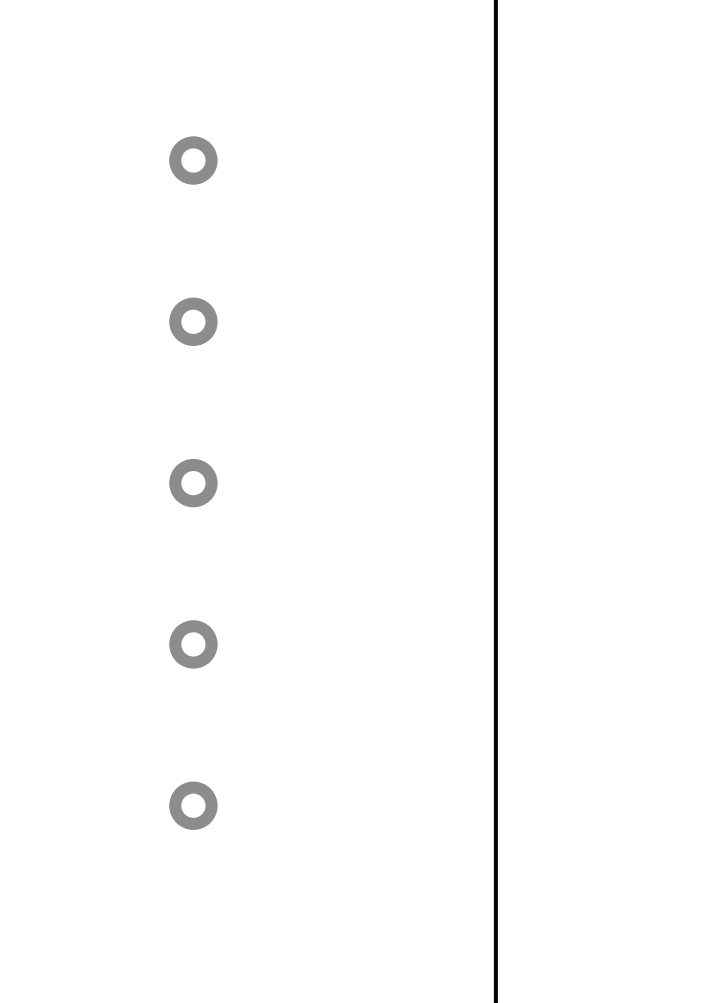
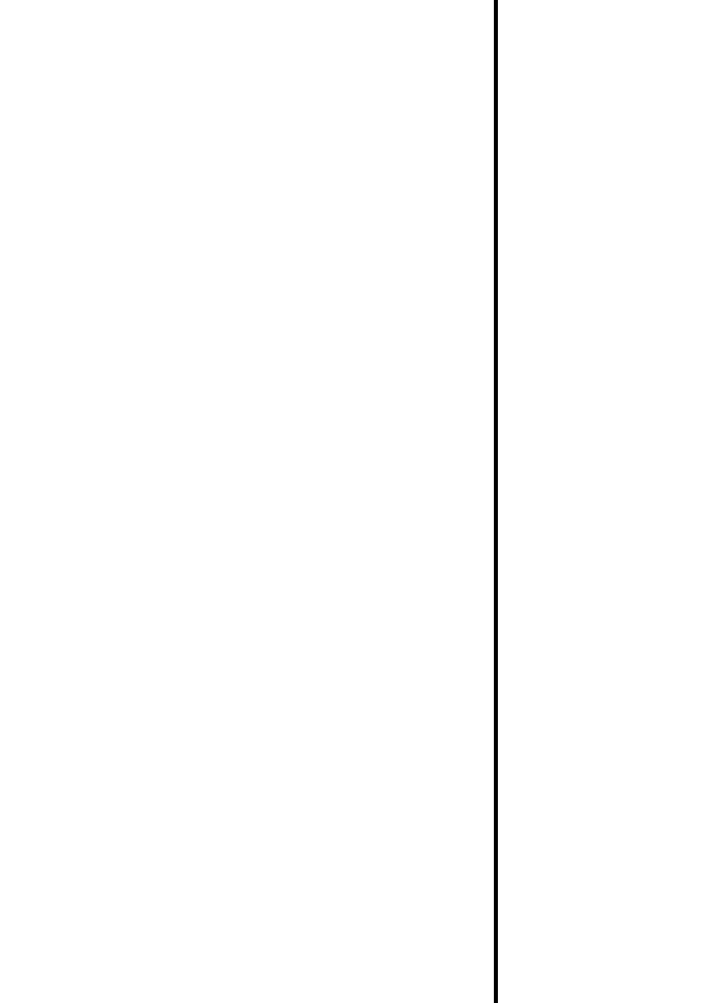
via: (193, 160) -> none
via: (193, 321) -> none
via: (193, 483) -> none
via: (193, 644) -> none
via: (193, 805) -> none

